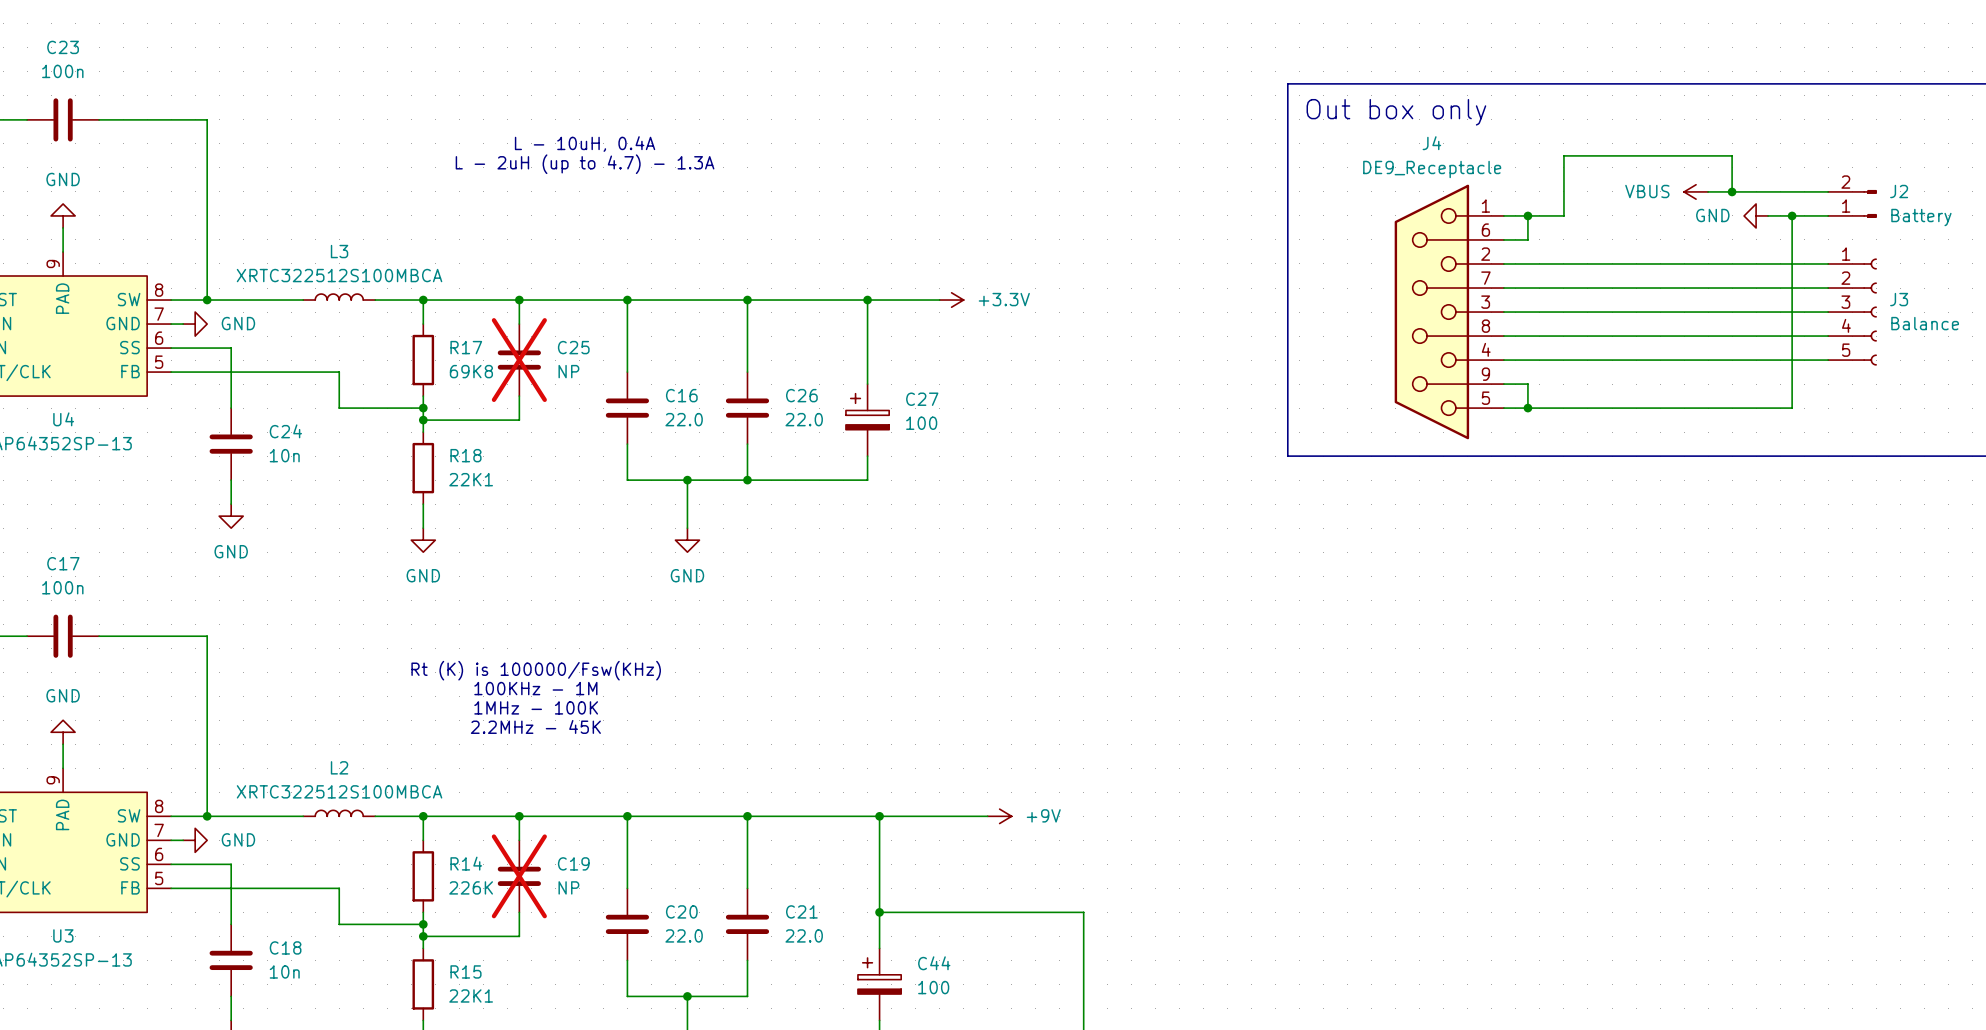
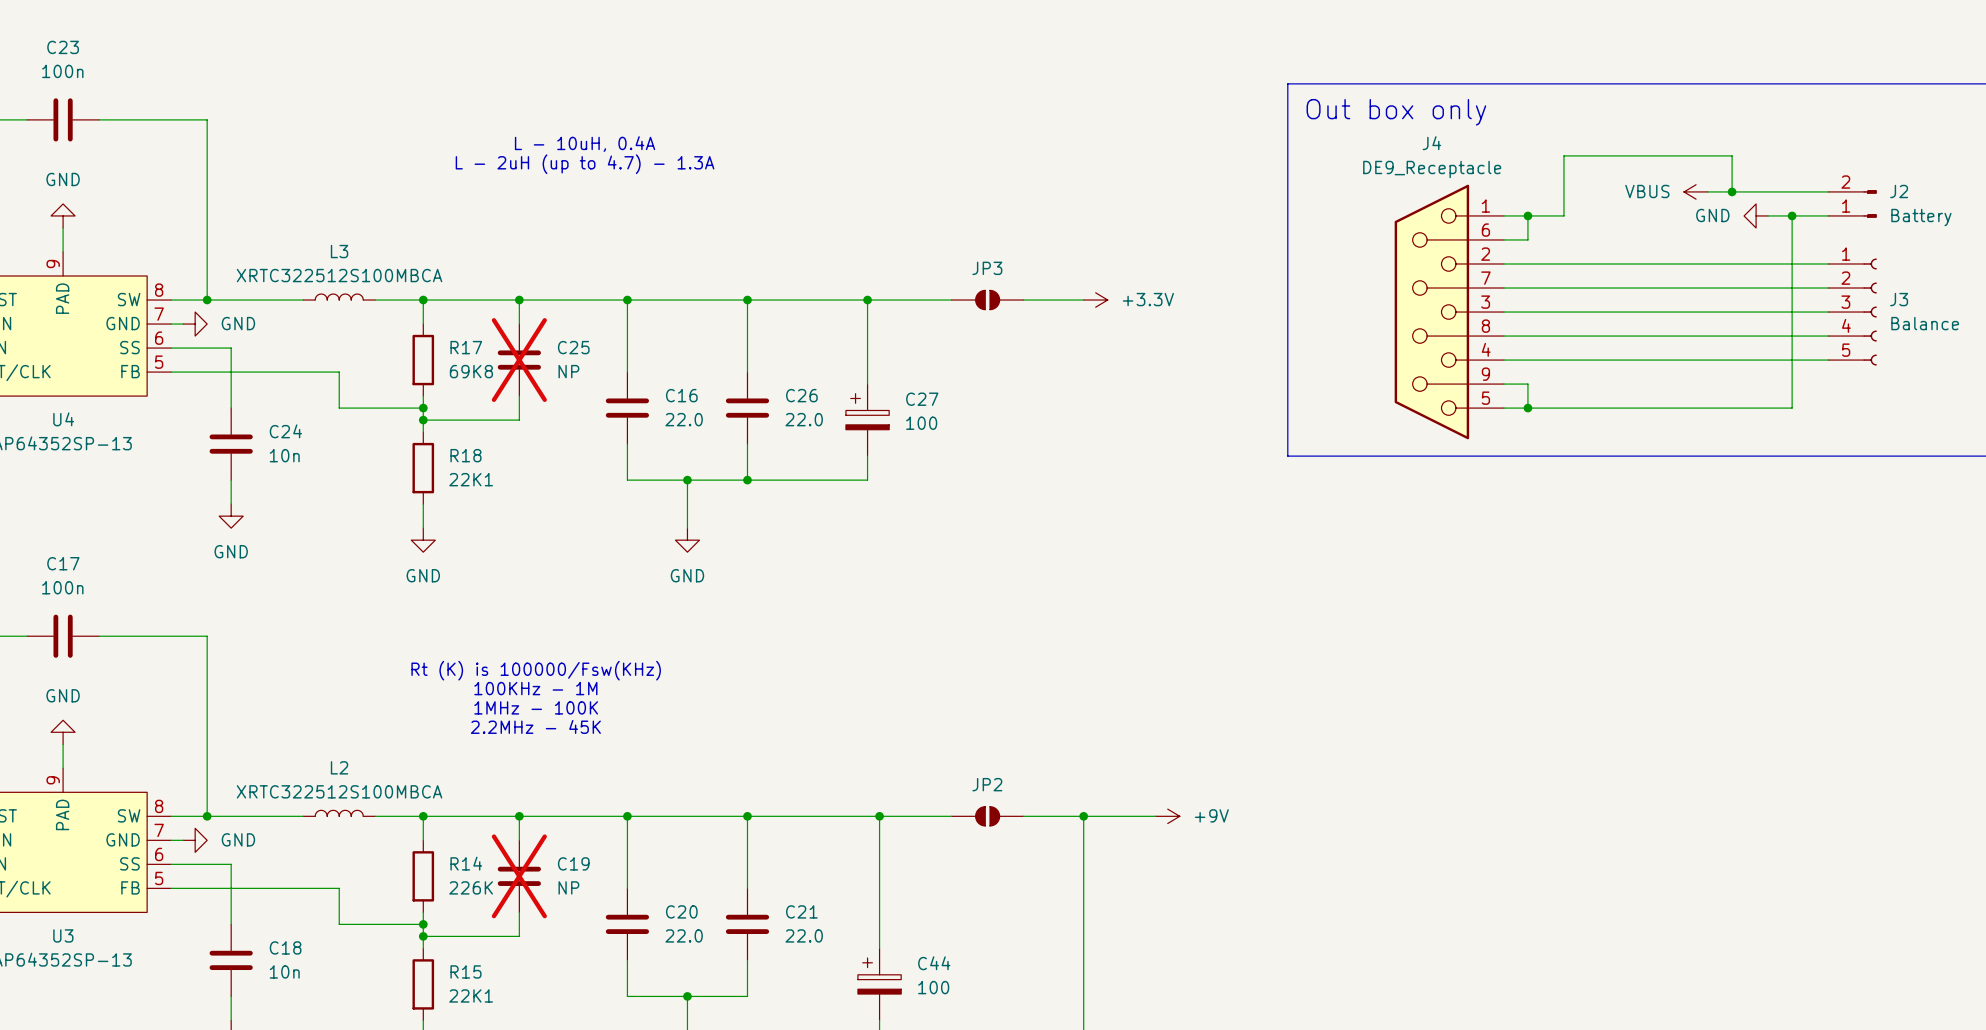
power symbol position: +3.3V (951, 300) -> +3.3V (1095, 300)
JP3: none -> (987, 300)
wire: none -> (1023, 300) (1083, 300)
JP2: none -> (987, 816)
power symbol position: +9V (999, 816) -> +9V (1167, 816)
wire: none -> (1023, 816) (1155, 816)
junction: none -> (1083, 816)
wire: (879, 912) (1083, 912) -> (1083, 816) (1083, 912)
junction: (879, 912) -> none

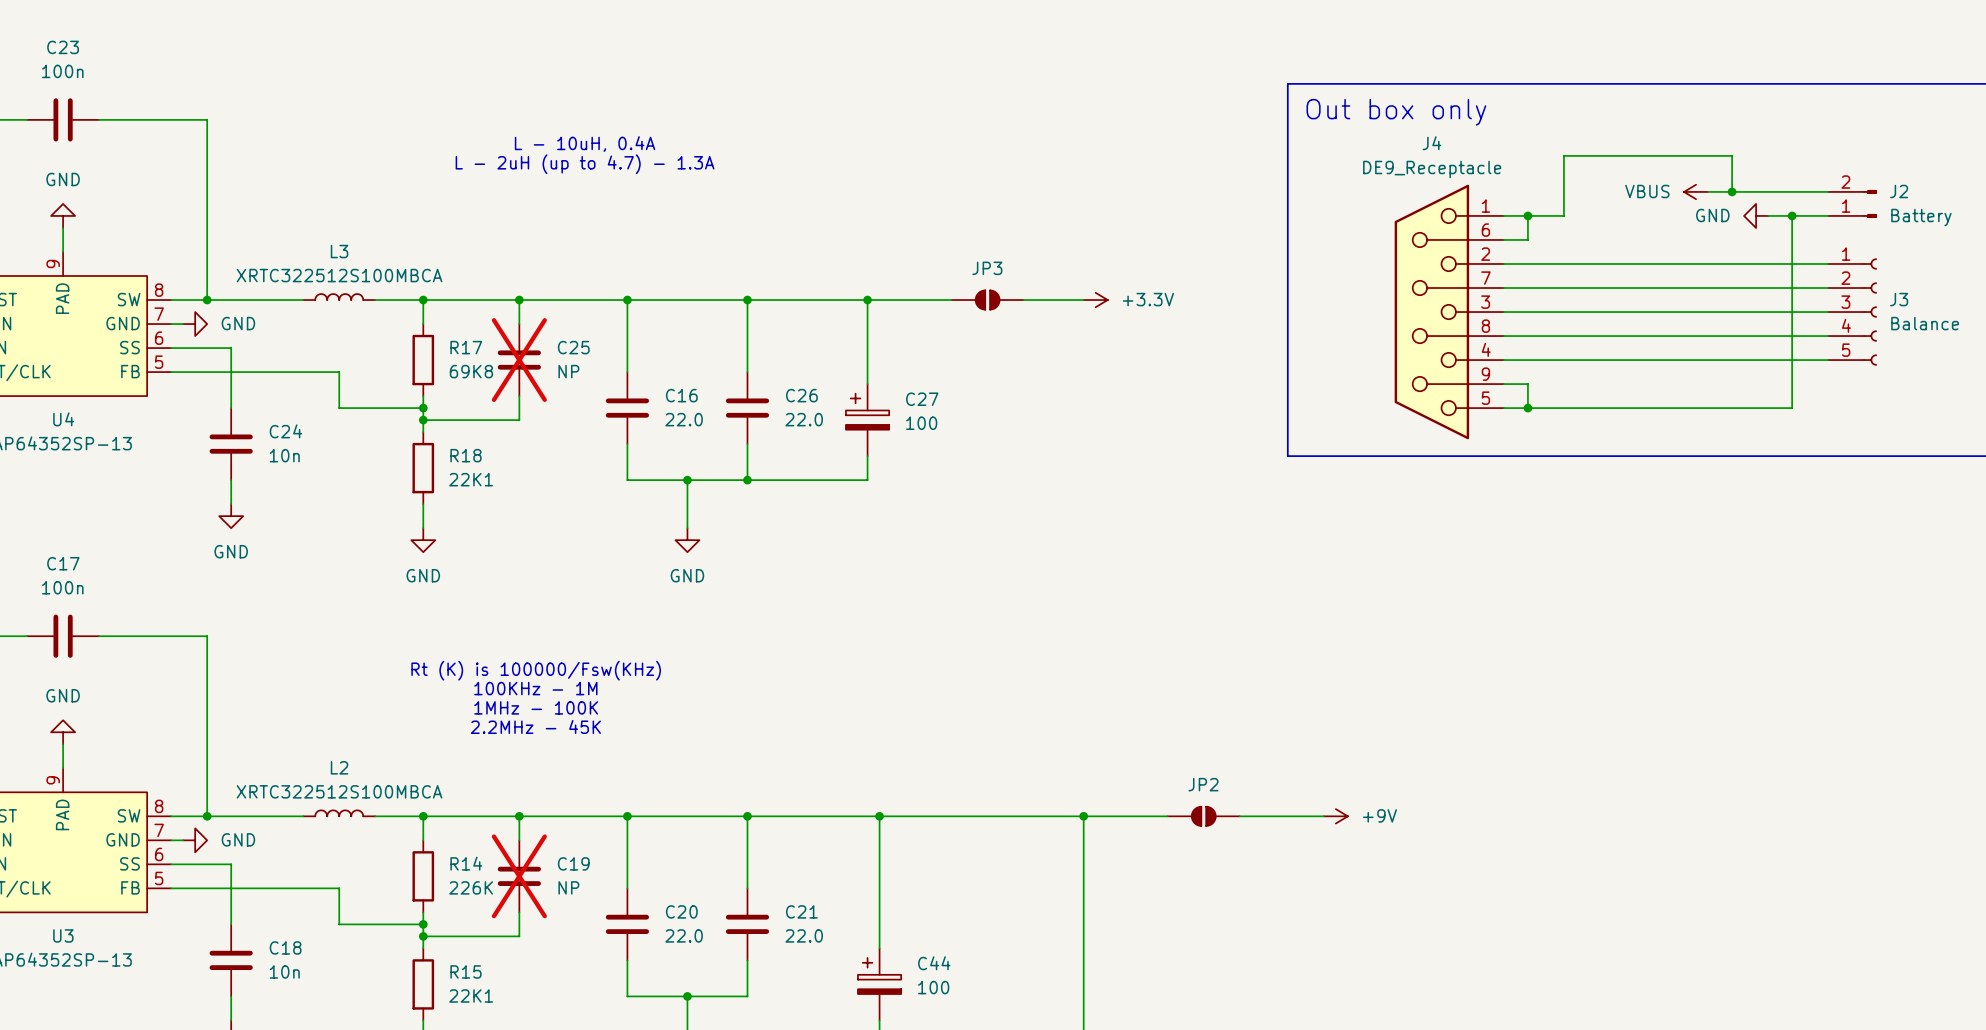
JP2 position: (987, 816) -> (1203, 816)
power symbol position: +9V (1167, 816) -> +9V (1335, 816)
wire: none -> (1239, 816) (1323, 816)

